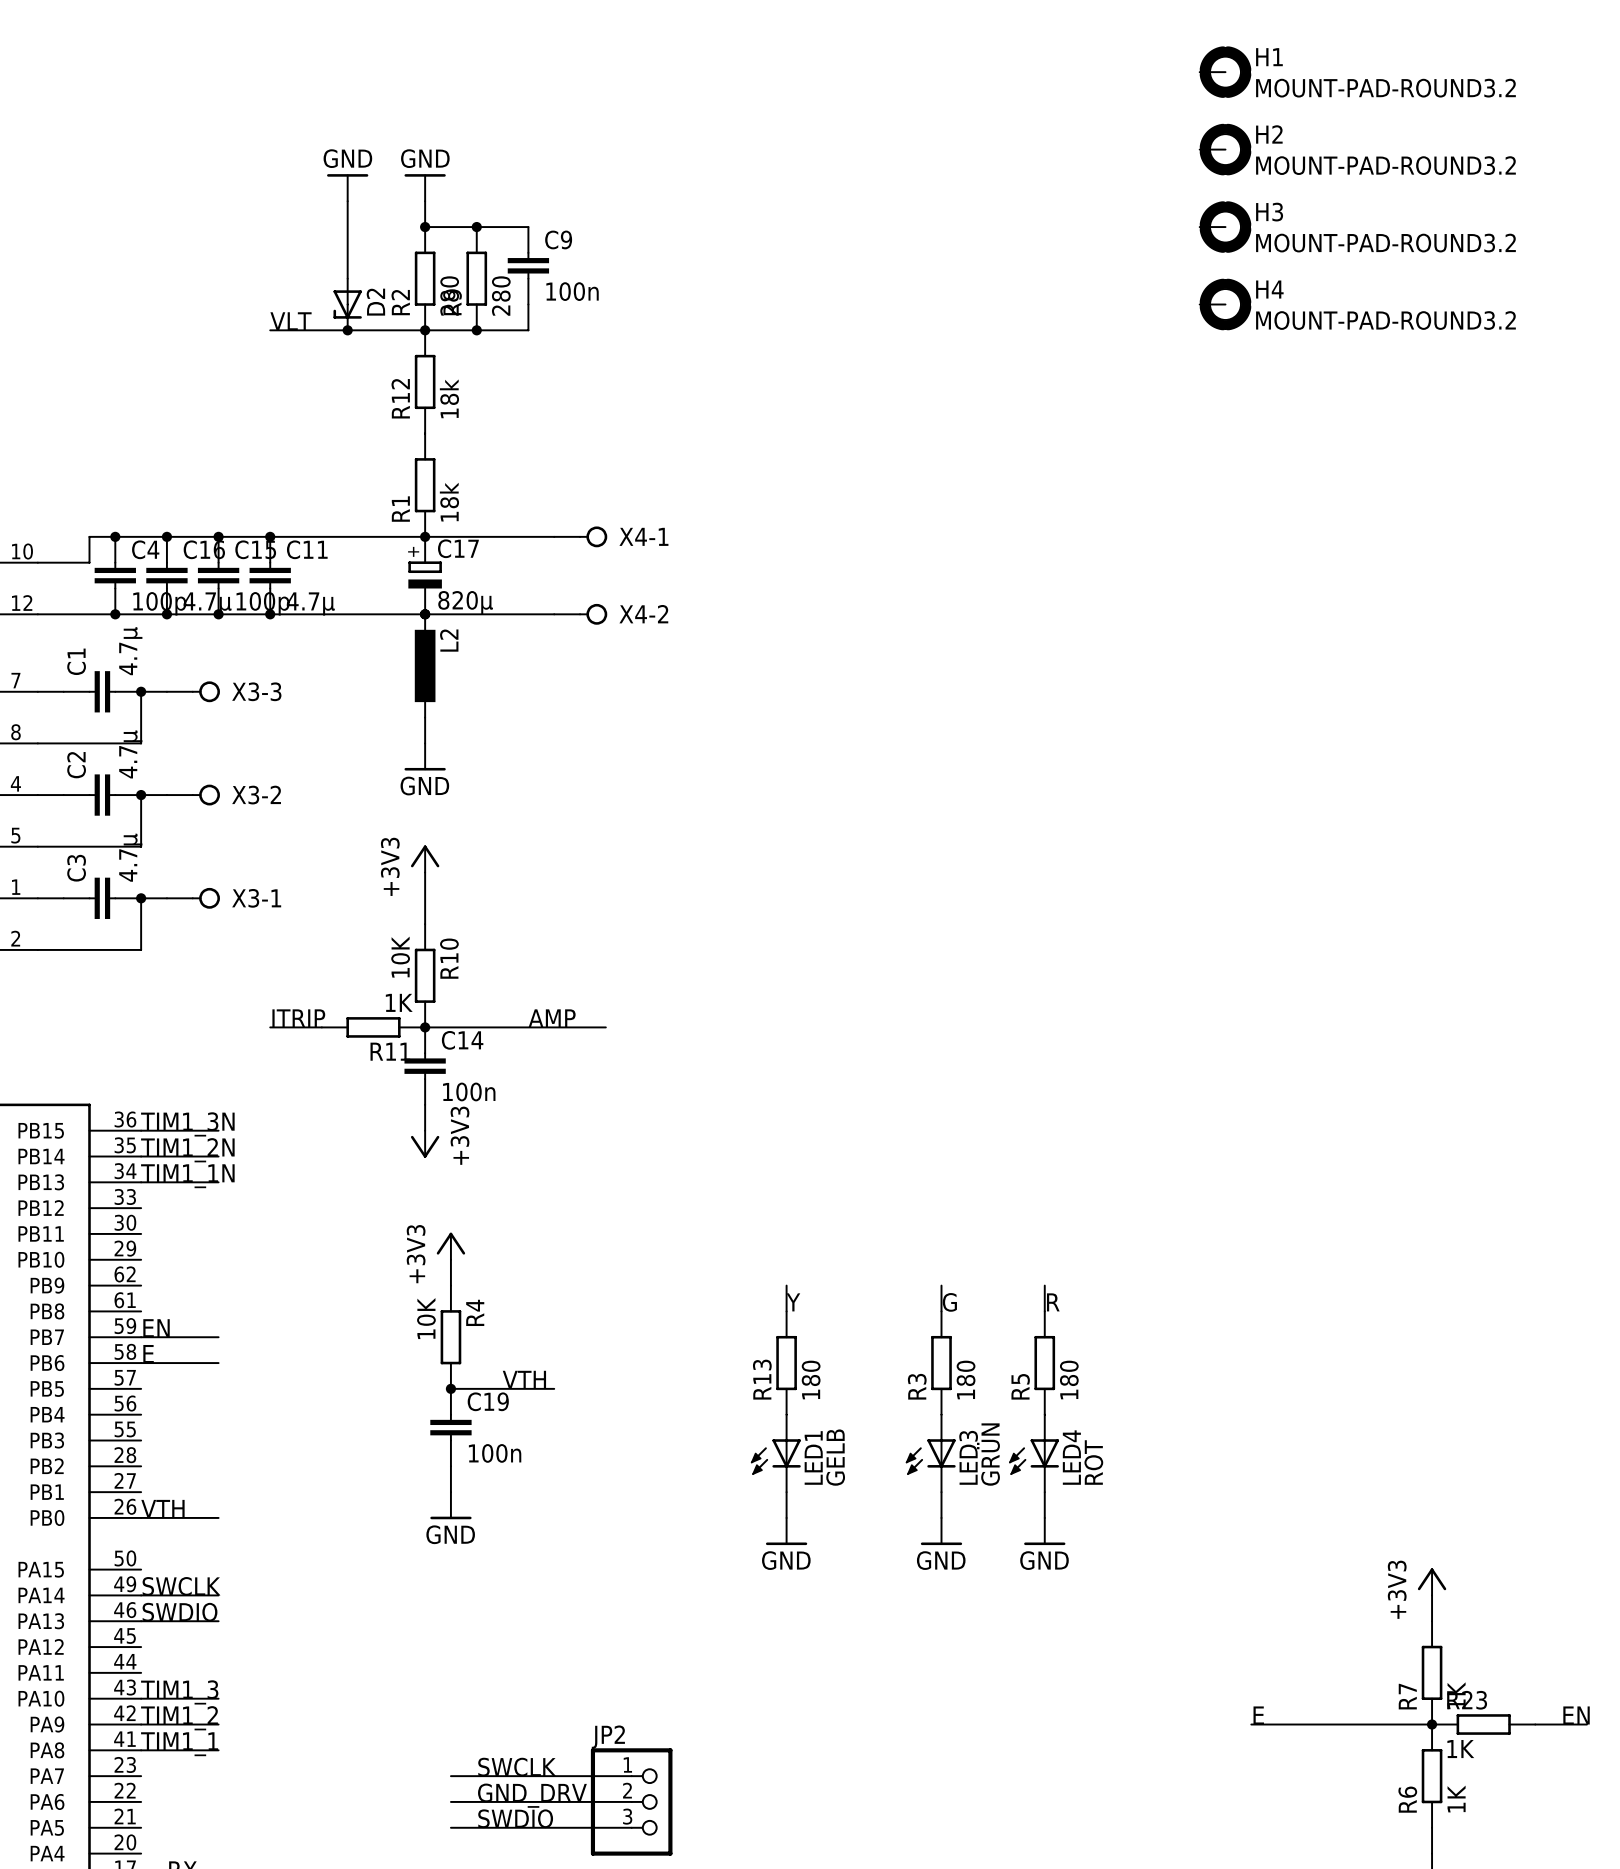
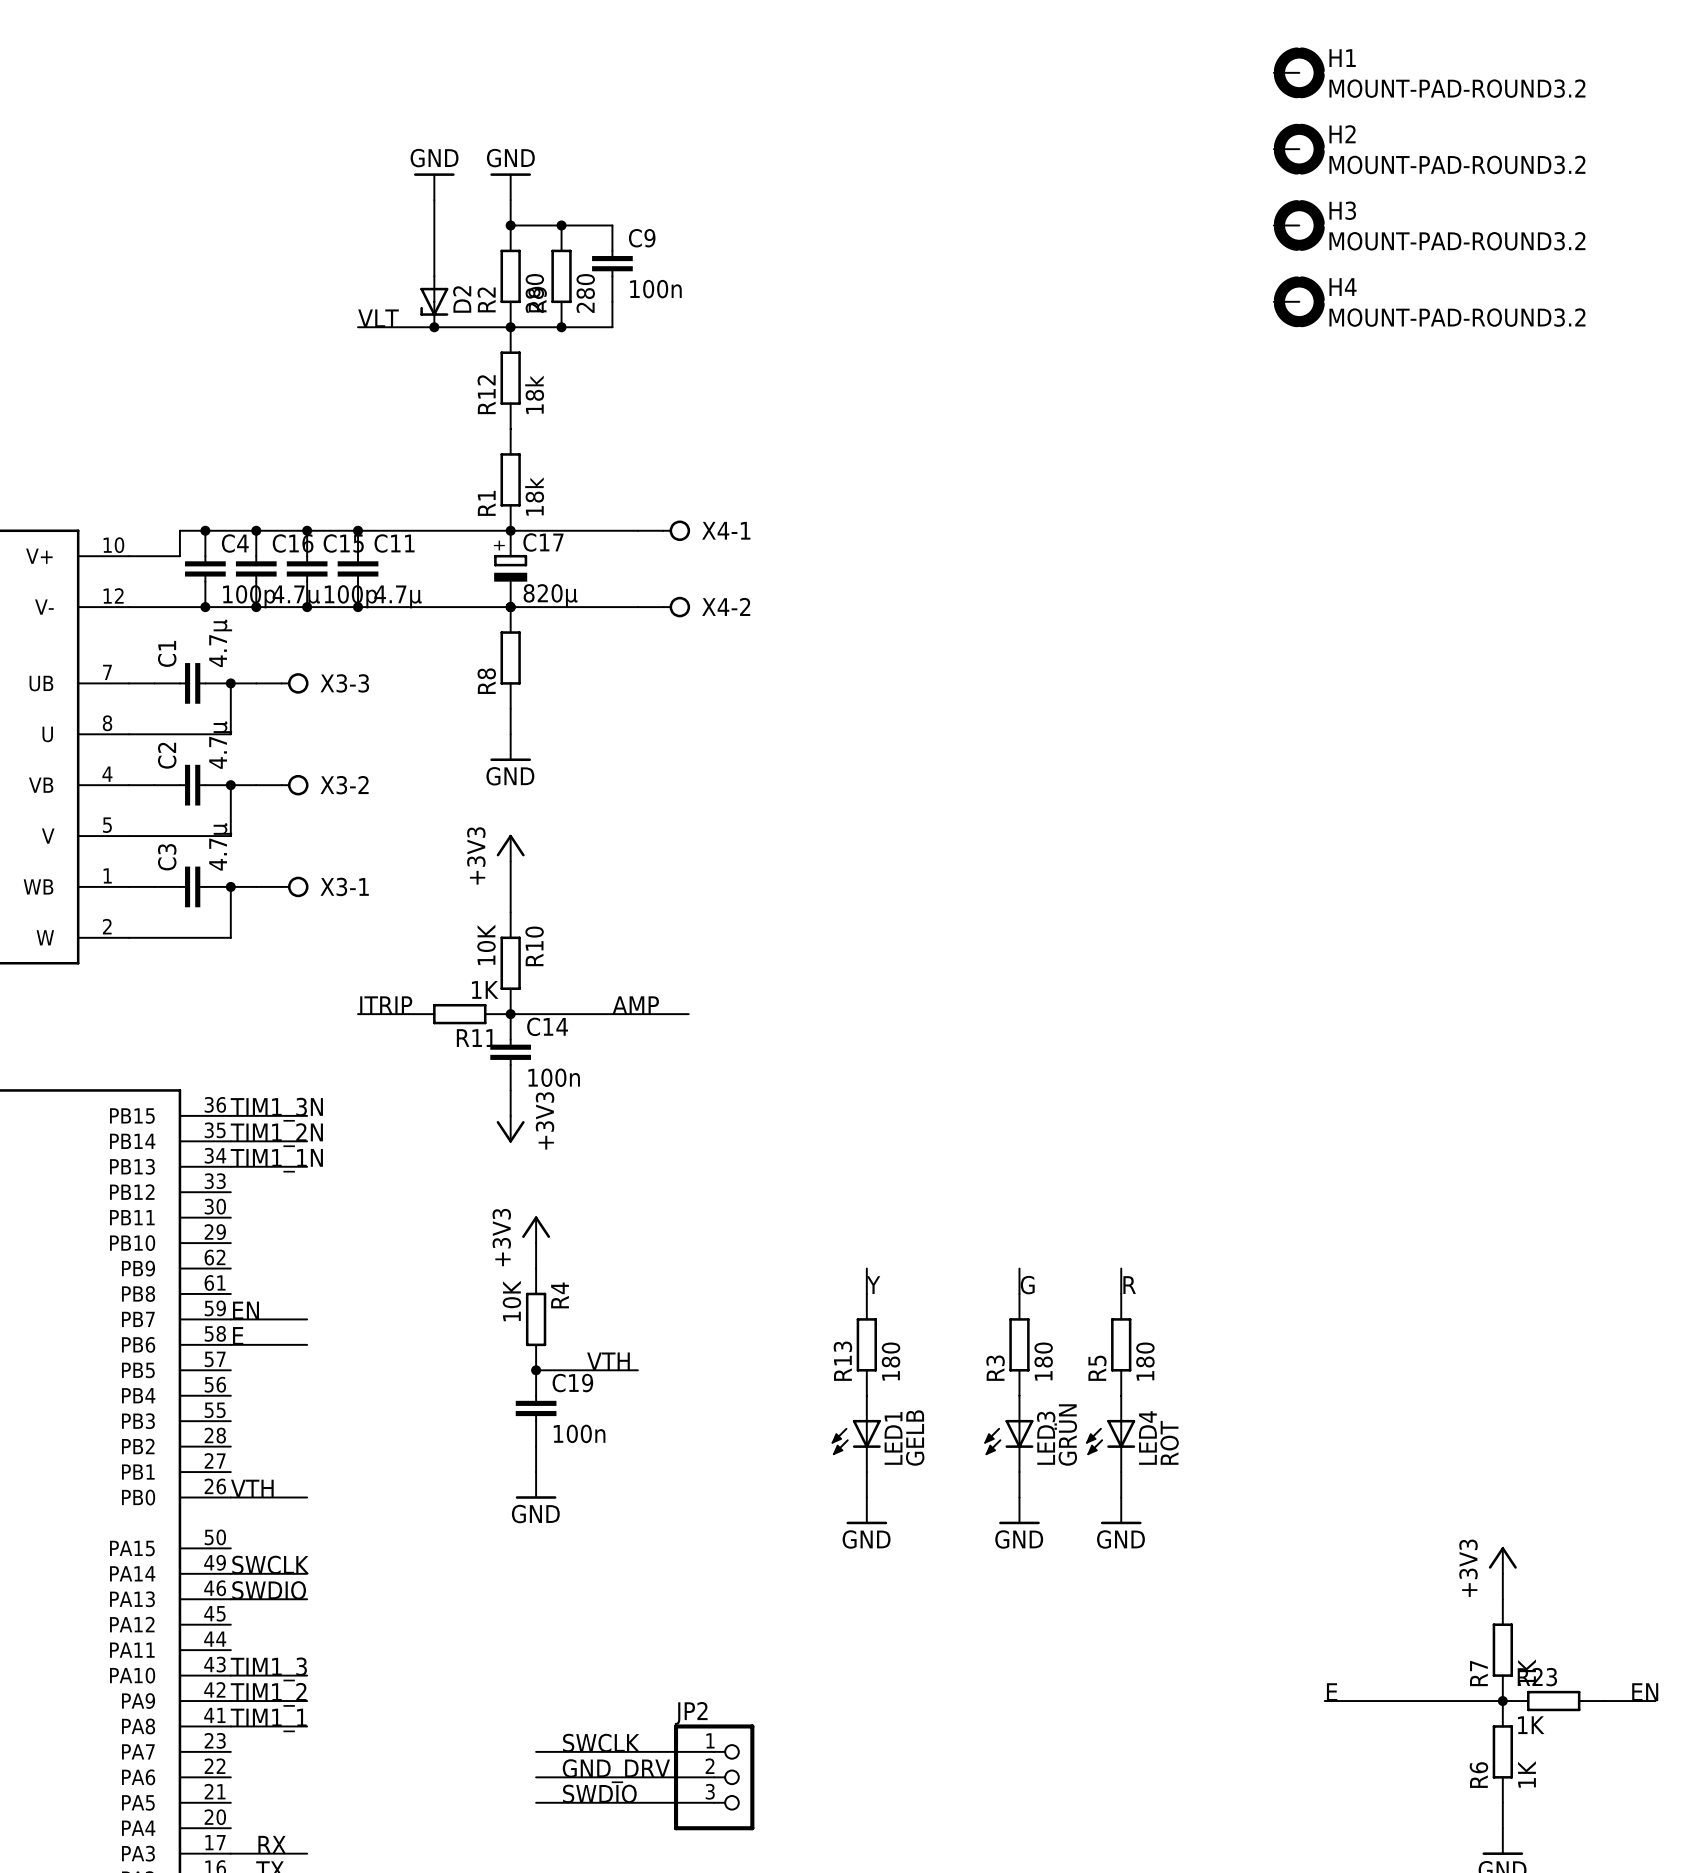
L2: (425, 665) -> none
R8: none -> (510, 657)

